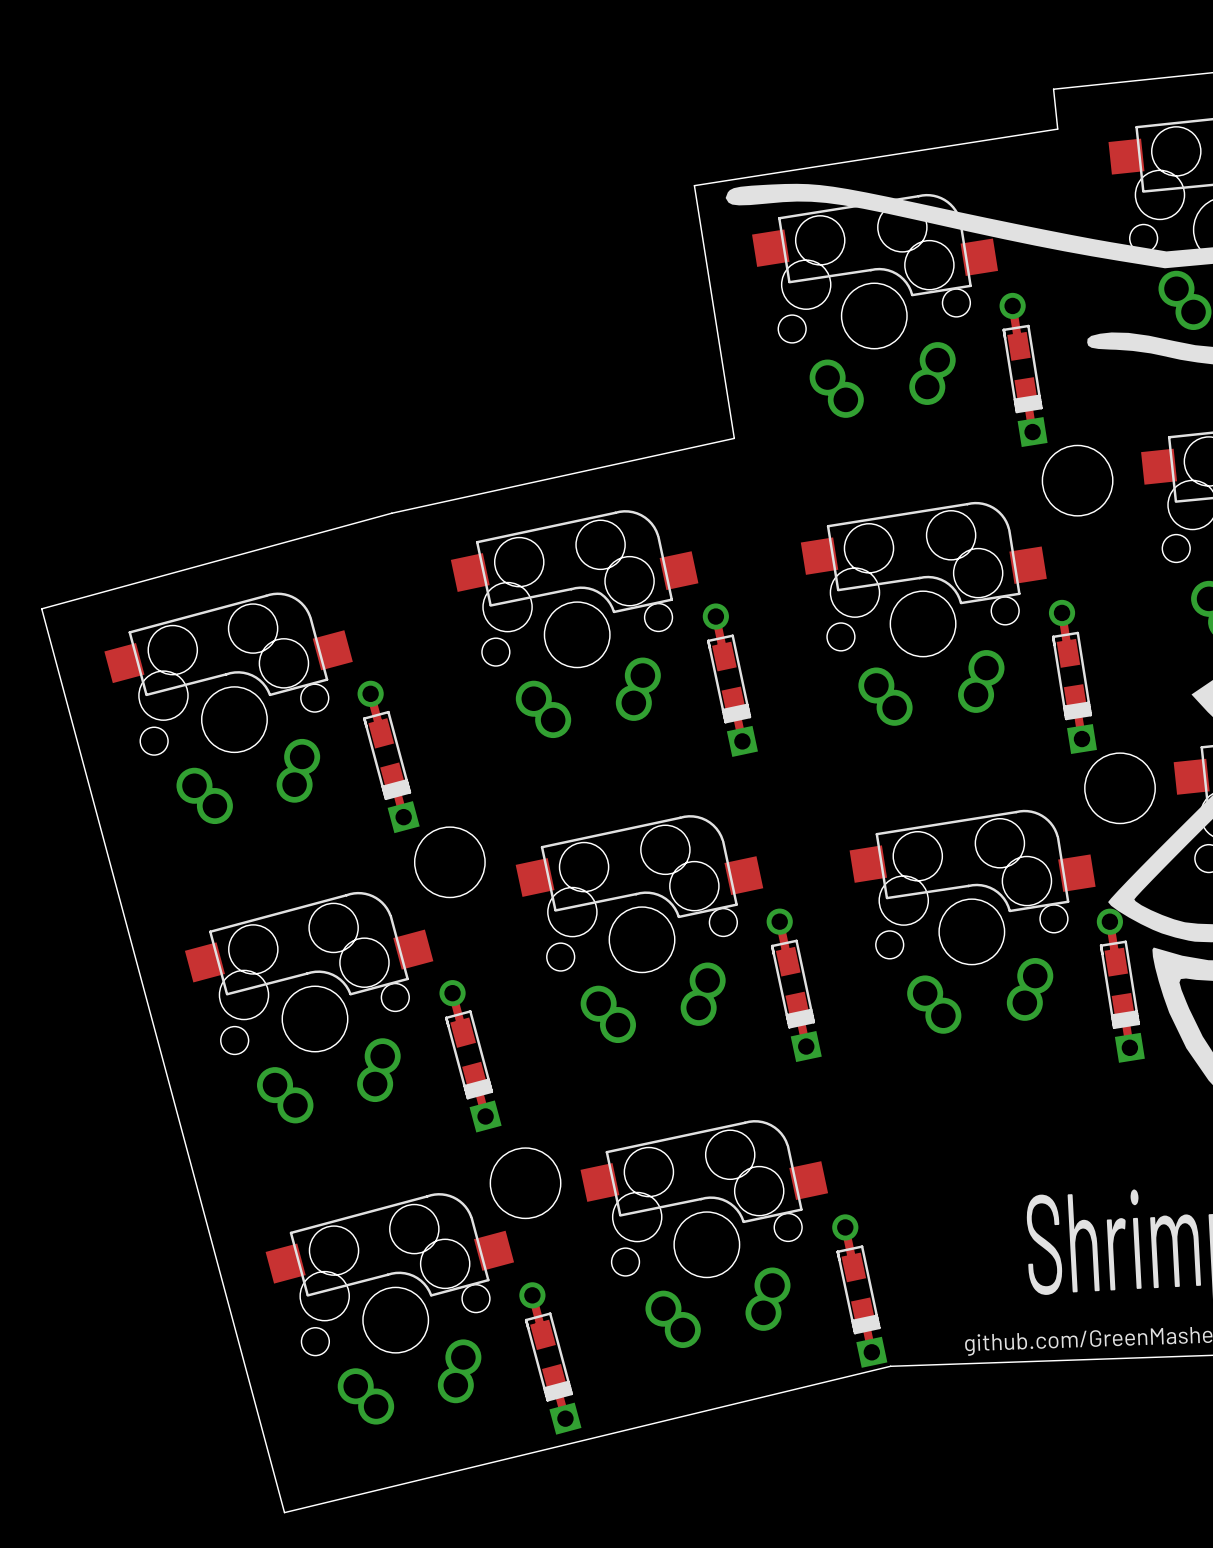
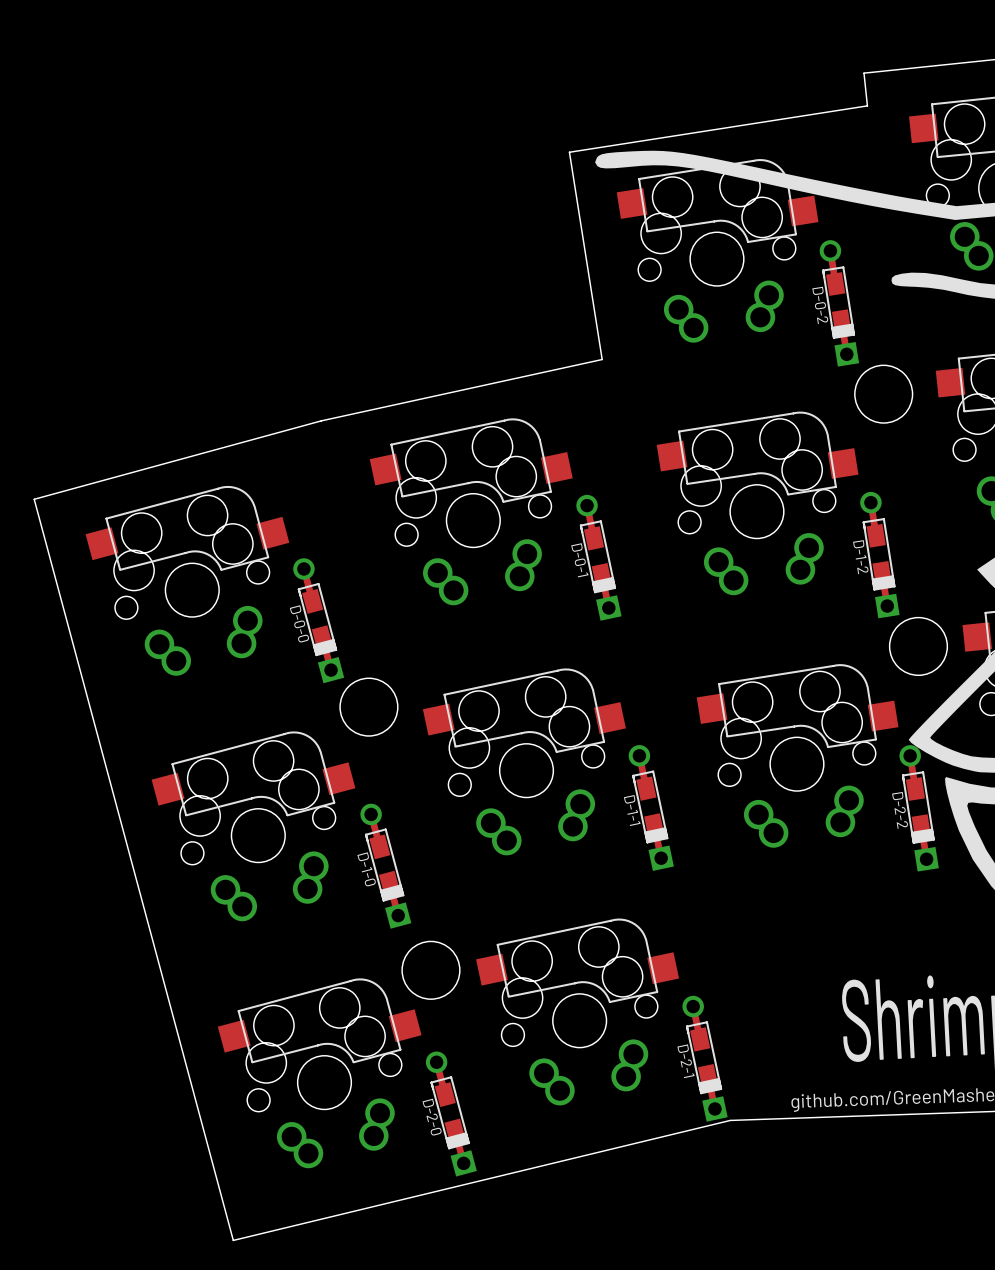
D-0-2 name: none -> D-0-2 (820, 305)
D-1-2 name: none -> D-1-2 (860, 557)
D-0-1 name: none -> D-0-1 (579, 560)
D-0-0 name: none -> D-0-0 (299, 623)
D-1-1 name: none -> D-1-1 (632, 810)
D-2-2 name: none -> D-2-2 (900, 810)
D-1-0 name: none -> D-1-0 (366, 869)
D-2-1 name: none -> D-2-1 (686, 1061)
D-2-0 name: none -> D-2-0 (432, 1117)

